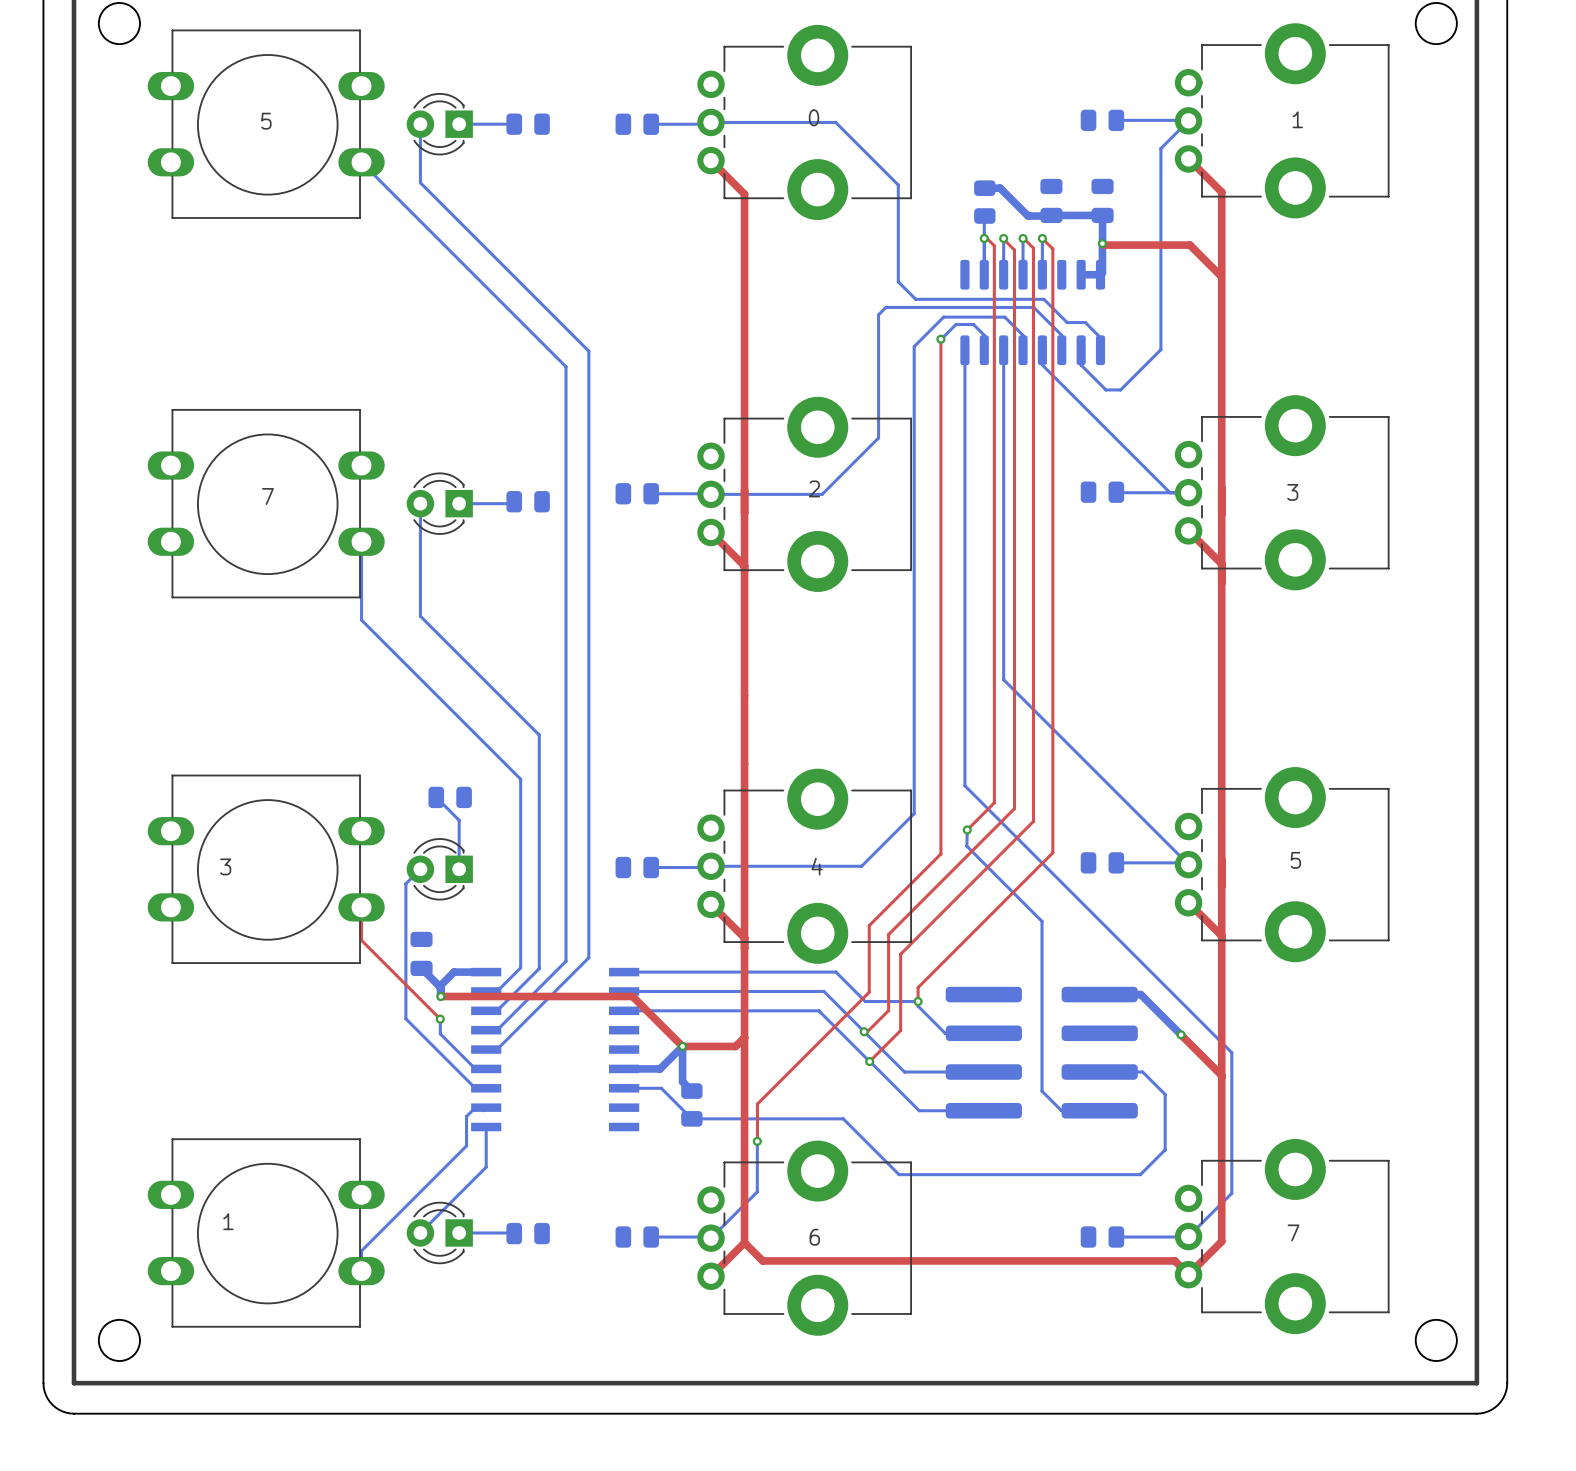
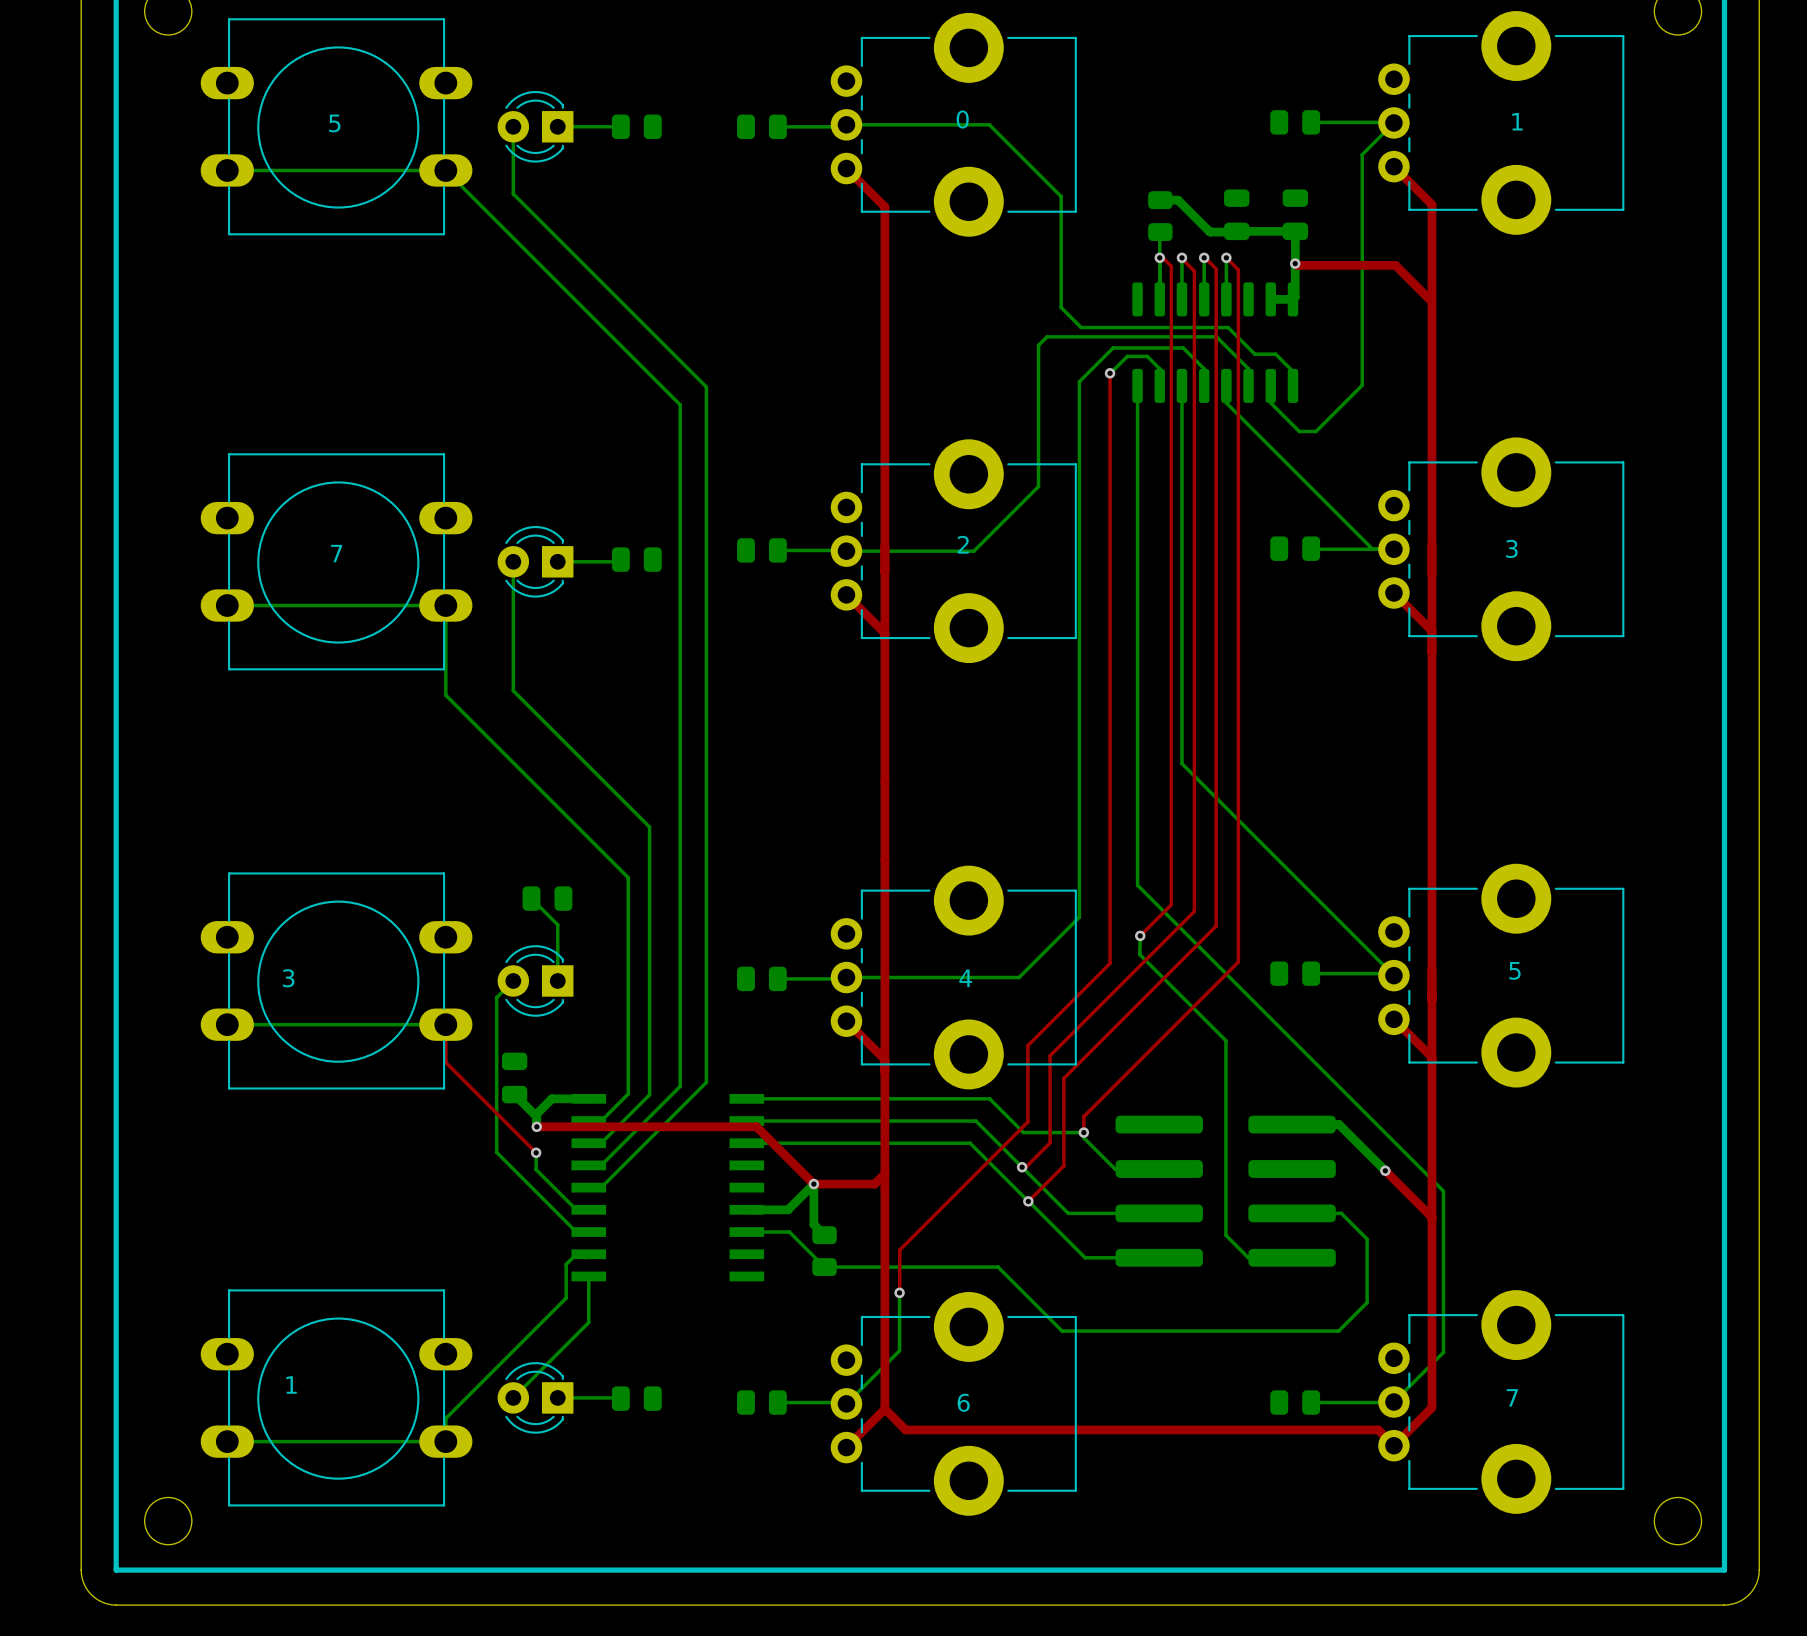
bottom track: none -> (227, 170) (445, 170)
bottom track: none -> (227, 605) (445, 605)
bottom track: none -> (227, 1024) (445, 1024)
bottom track: none -> (227, 1441) (445, 1441)

